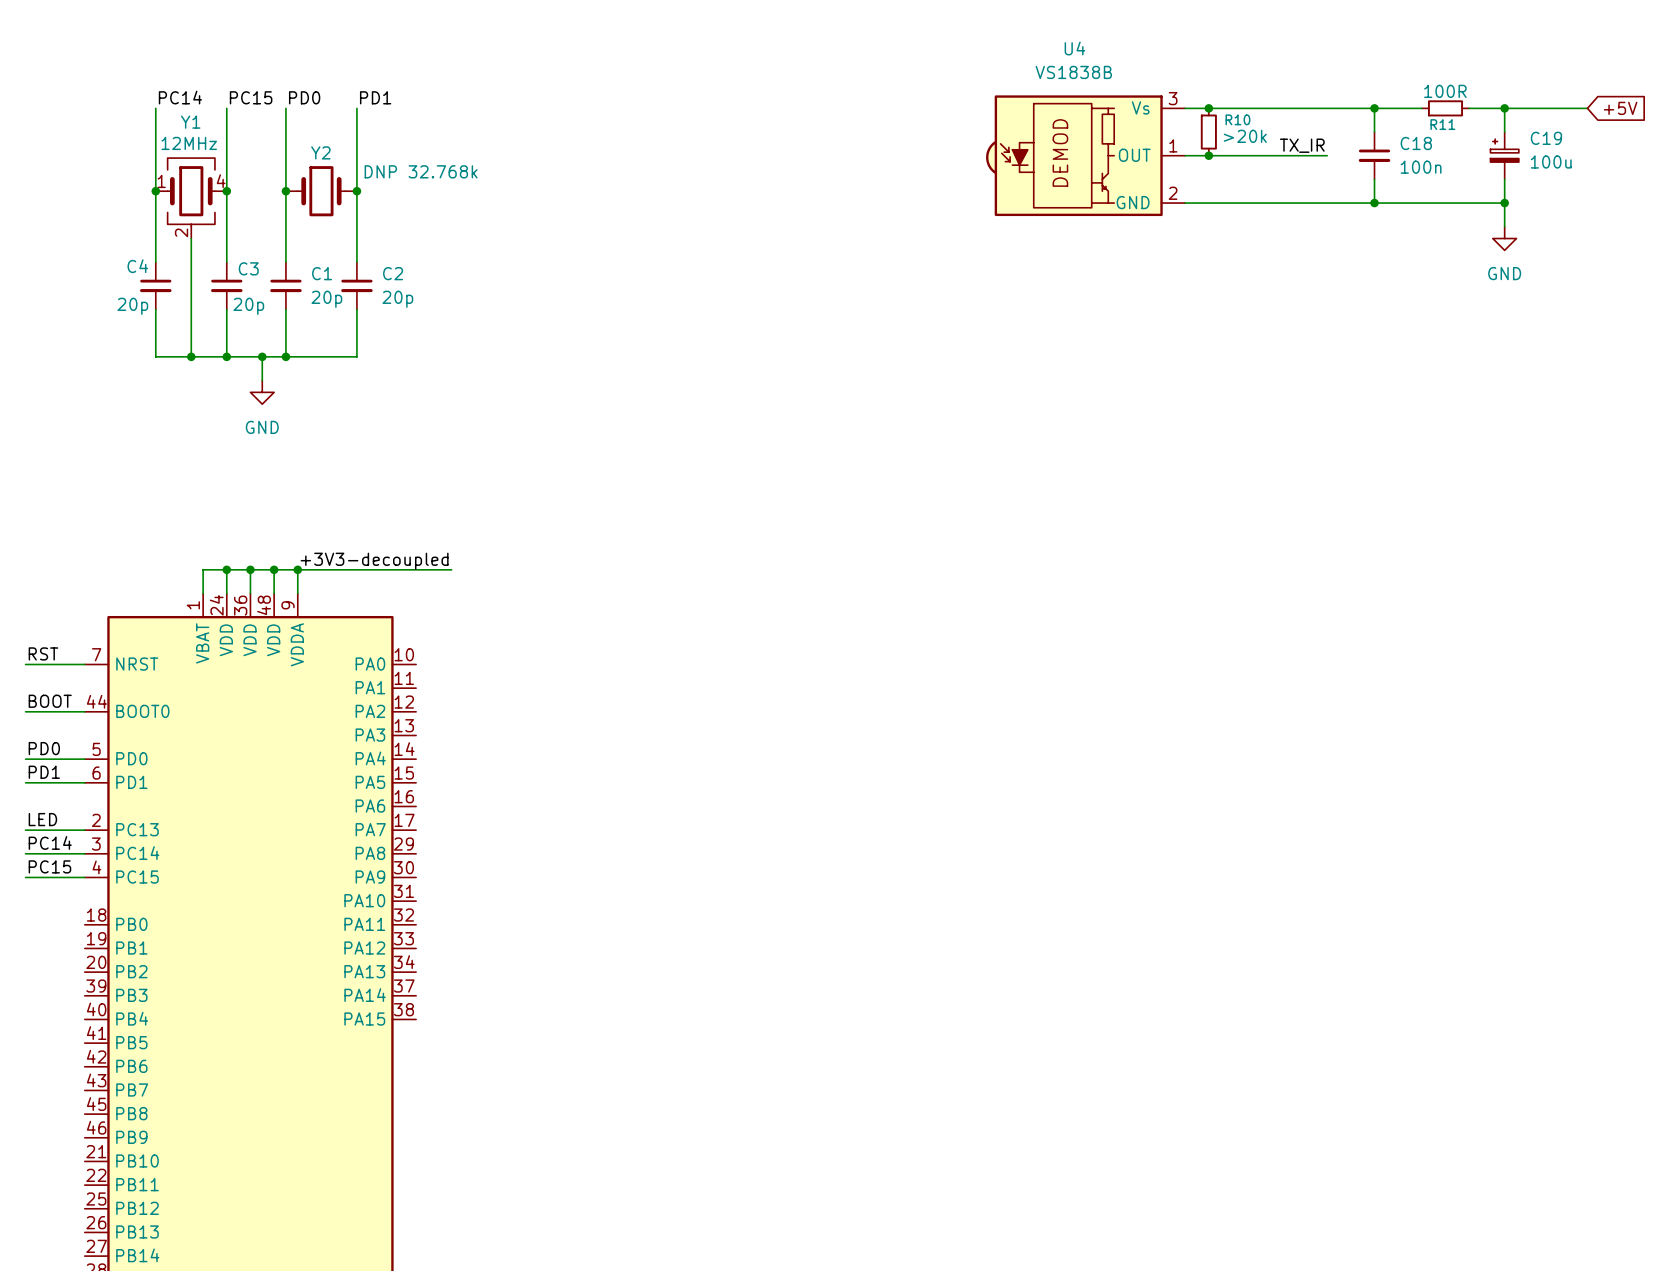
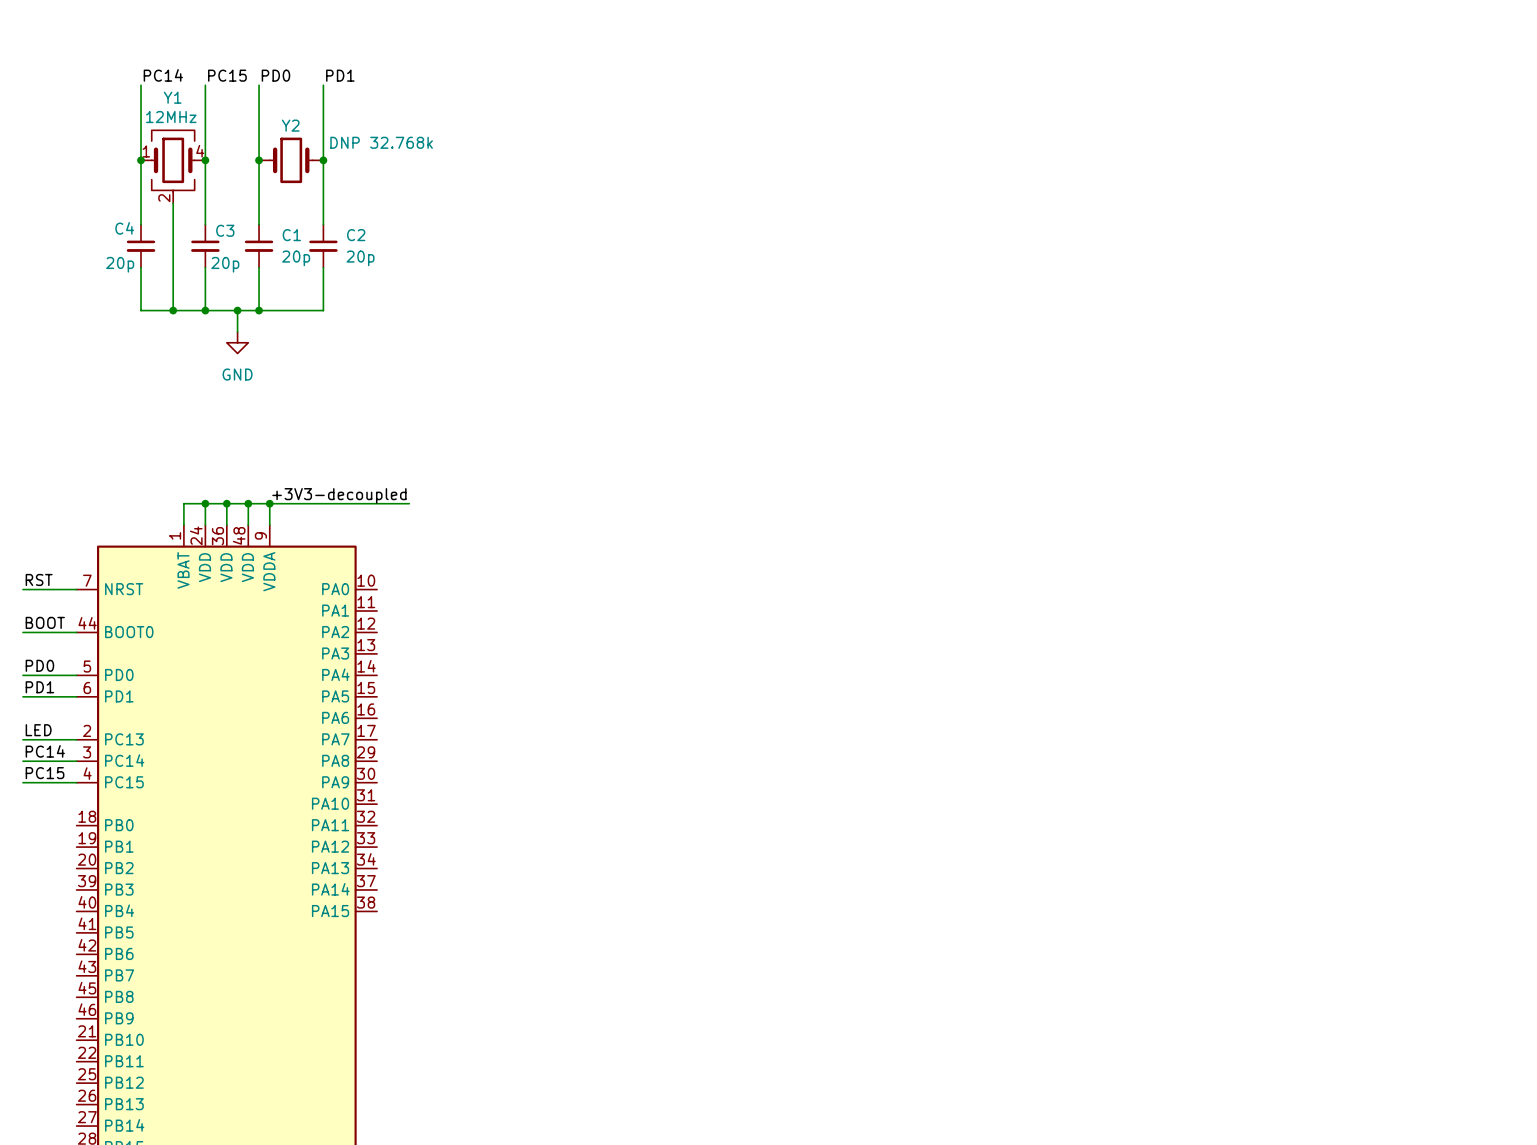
wire: (1185, 108) (1421, 108) -> none
junction: (1208, 108) -> none
wire: (1374, 108) (1374, 132) -> none
junction: (1374, 108) -> none
R11: 100R (1445, 108) -> none
wire: (1469, 108) (1587, 108) -> none
wire: (1504, 108) (1504, 132) -> none
junction: (1504, 108) -> none
global label: +5V (1620, 108) -> none
R10: >20k (1208, 132) -> none
label: TX_IR (1302, 145) -> none
U4: VS1838B (1085, 155) -> none
wire: (1185, 155) (1327, 155) -> none
junction: (1208, 155) -> none
C18: 100n (1374, 155) -> none
C19: 100u (1504, 155) -> none
wire: (1374, 179) (1374, 203) -> none
wire: (1504, 179) (1504, 226) -> none
wire: (1185, 203) (1504, 203) -> none
junction: (1374, 203) -> none
junction: (1504, 203) -> none
power symbol: GND (1504, 238) -> none

